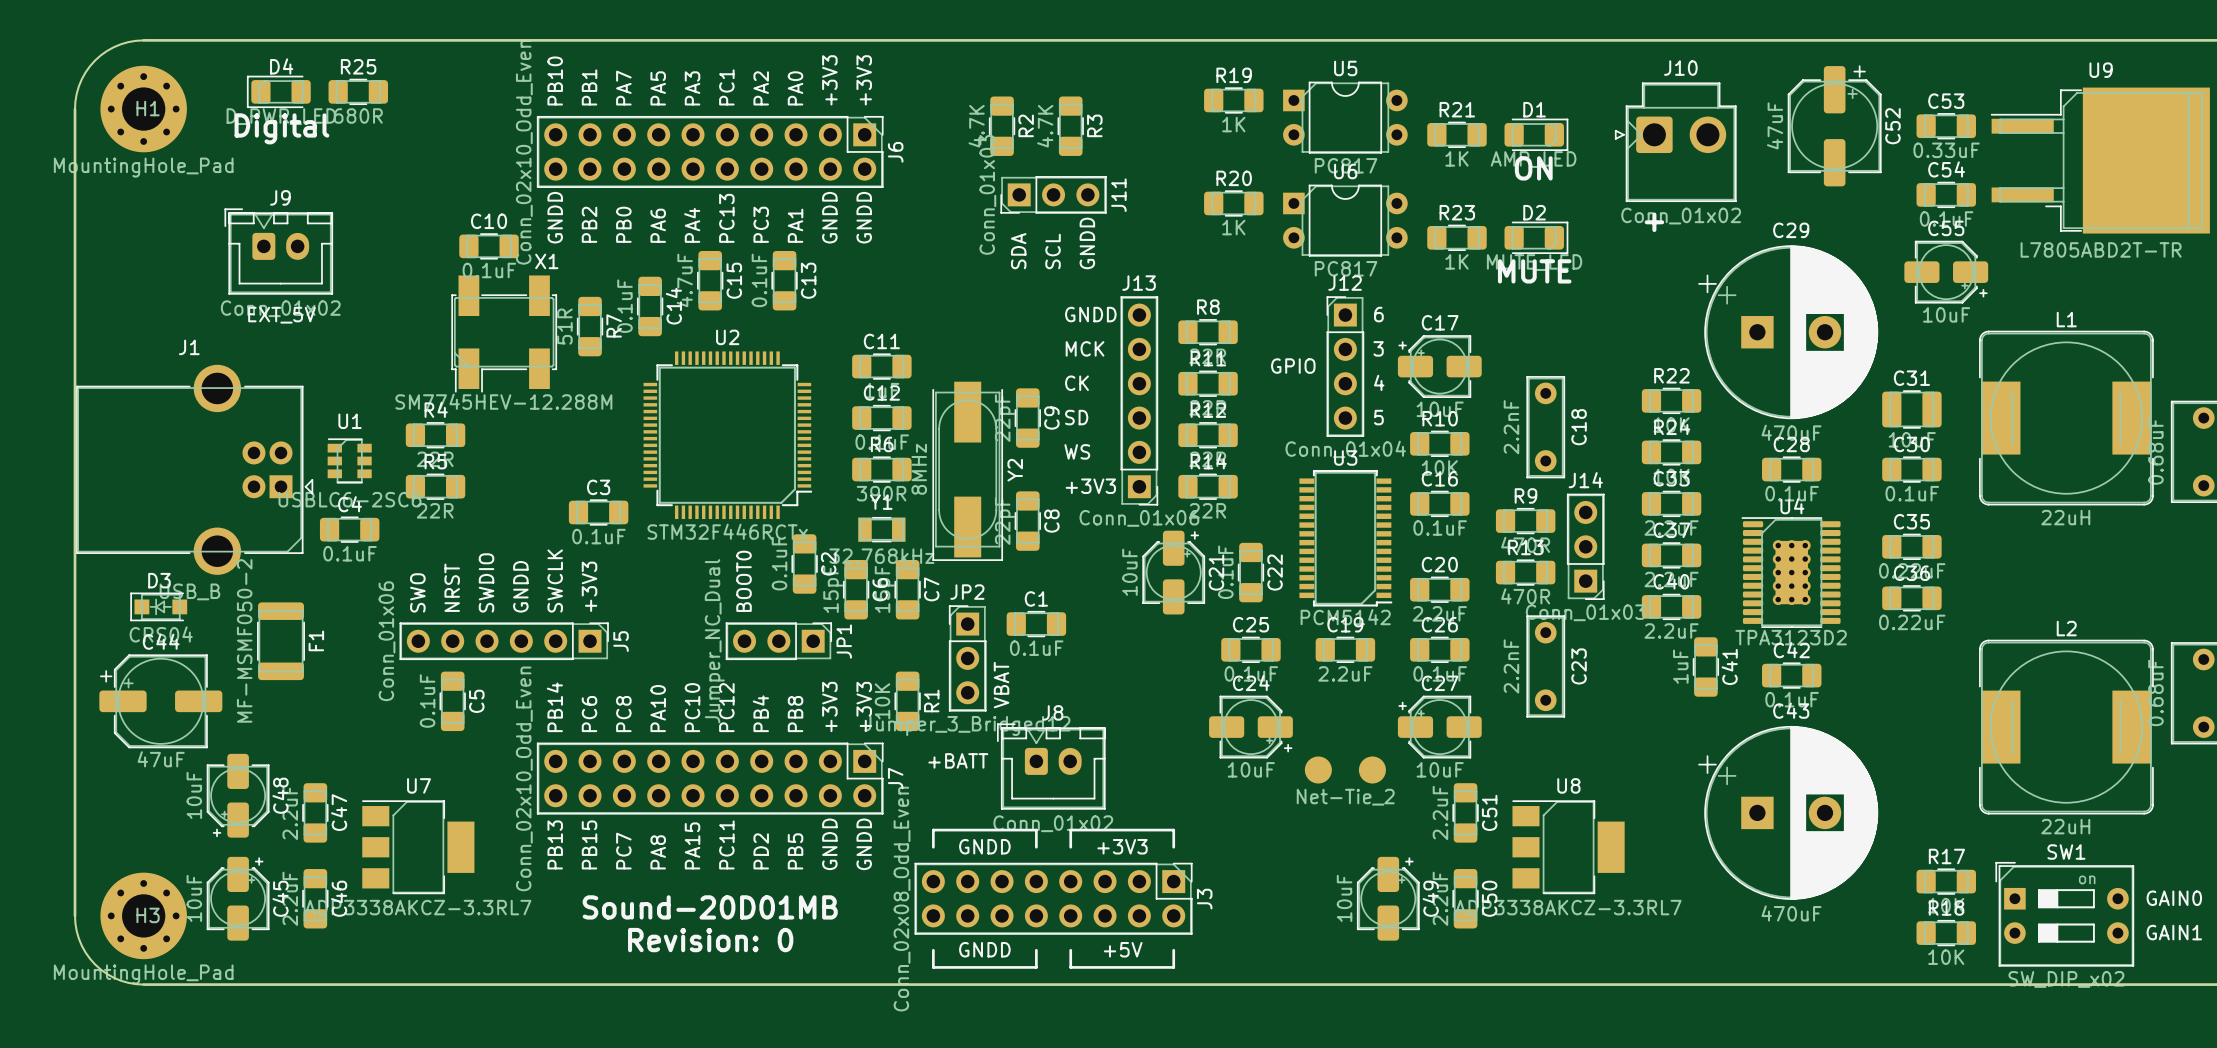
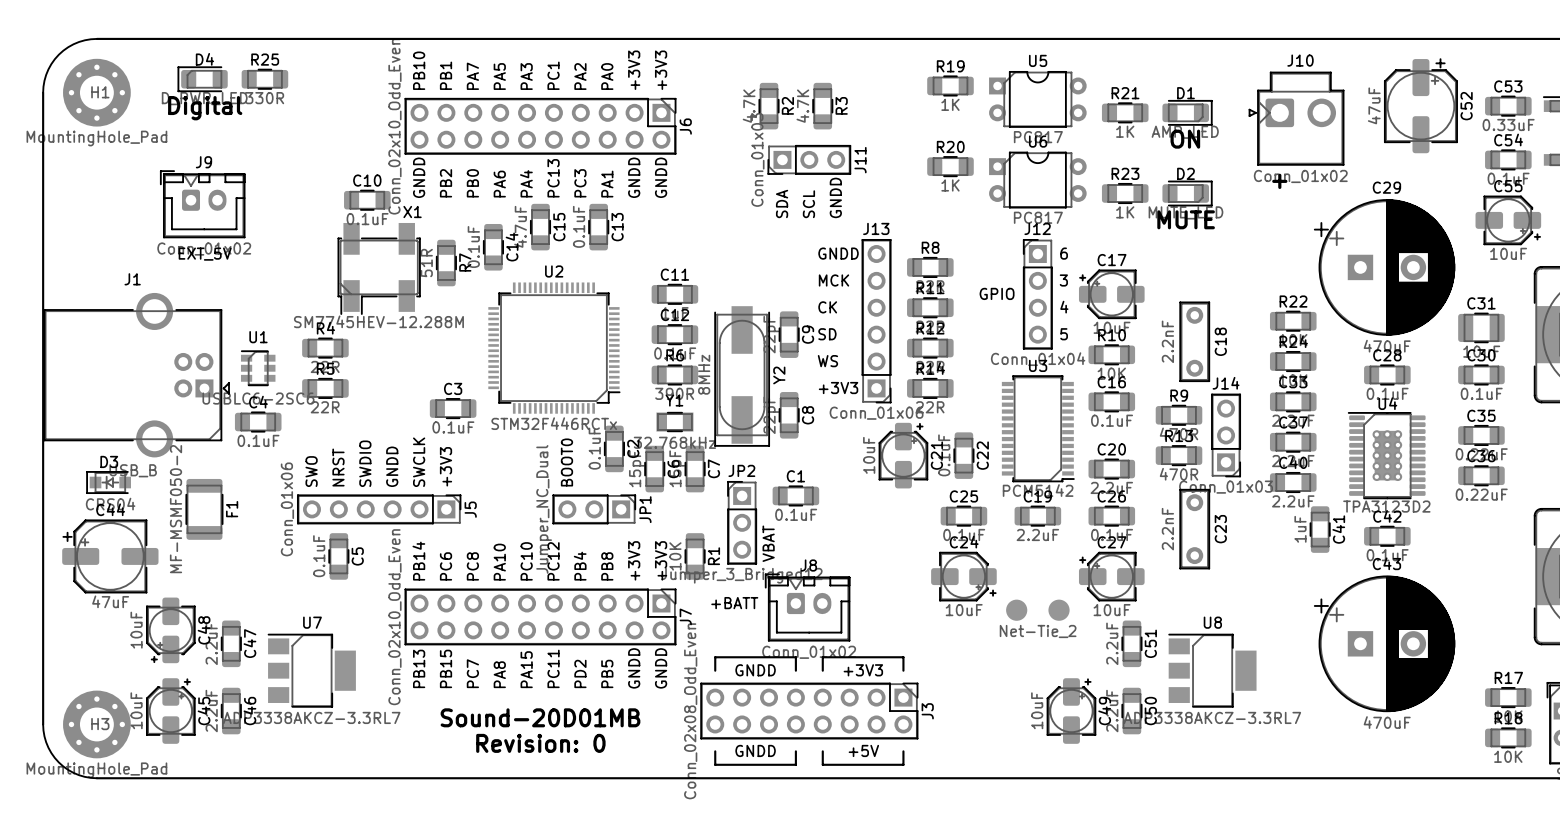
R25 value: 680R (358, 115) -> 330R (264, 98)

